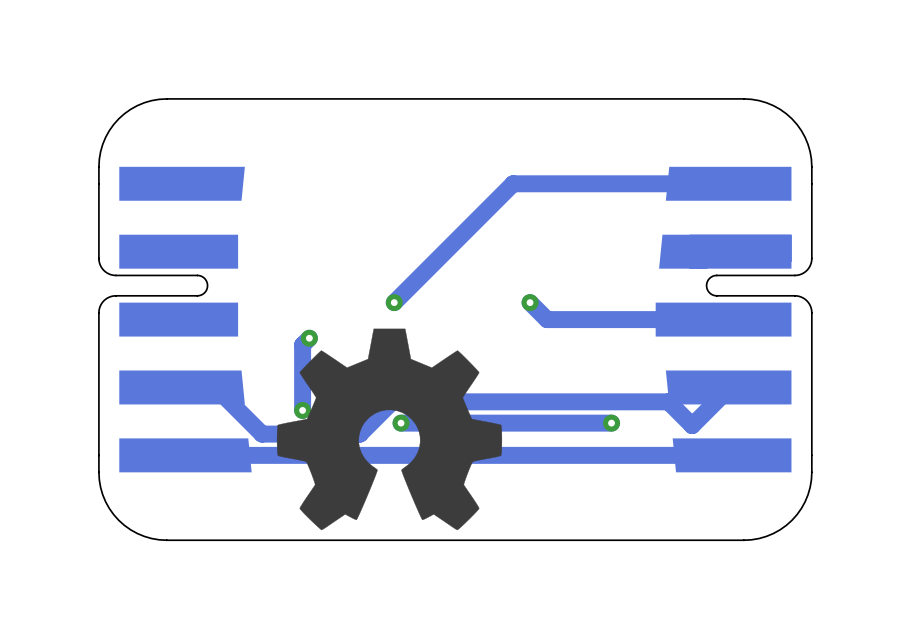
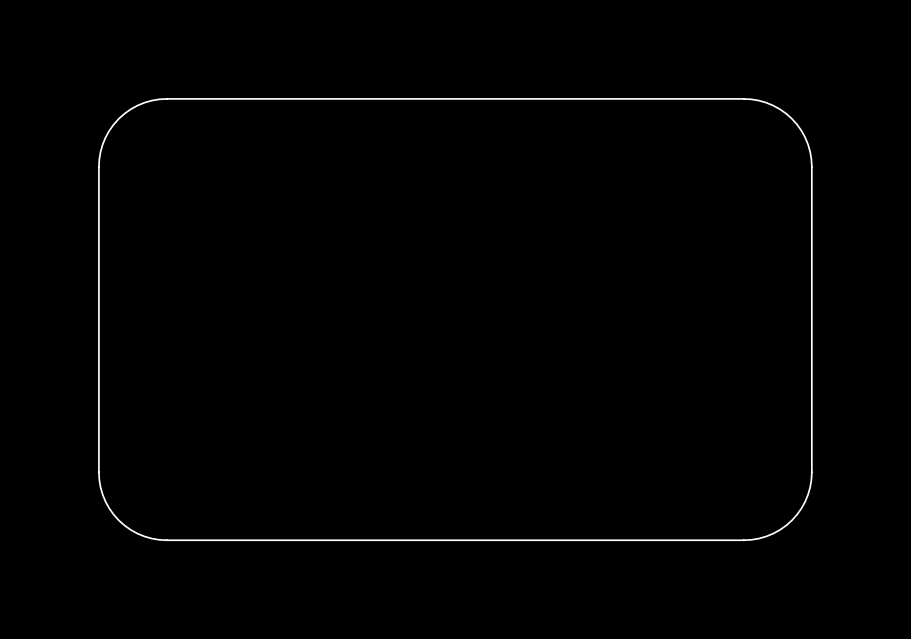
board edge: none -> (98, 183) (98, 455)
track: (730, 183) (513, 183) (394, 302) -> none
board edge: none -> (811, 183) (811, 455)
via: (394, 302) -> none
track: (530, 302) (547, 319) (723, 319) -> none
via: (530, 302) -> none
part: (174, 319) -> none
part: (734, 319) -> none
drawing: [276, 328, 503, 531] -> none
track: (309, 338) (302, 345) (302, 410) -> none
via: (309, 338) -> none
track: (730, 387) (692, 425) (668, 401) (392, 401) (359, 434) (262, 434) (215, 387) (180, 387) -> none
via: (302, 410) -> none
via: (401, 423) -> none
track: (611, 423) (401, 423) -> none
via: (611, 423) -> none
track: (733, 455) (183, 455) -> none

